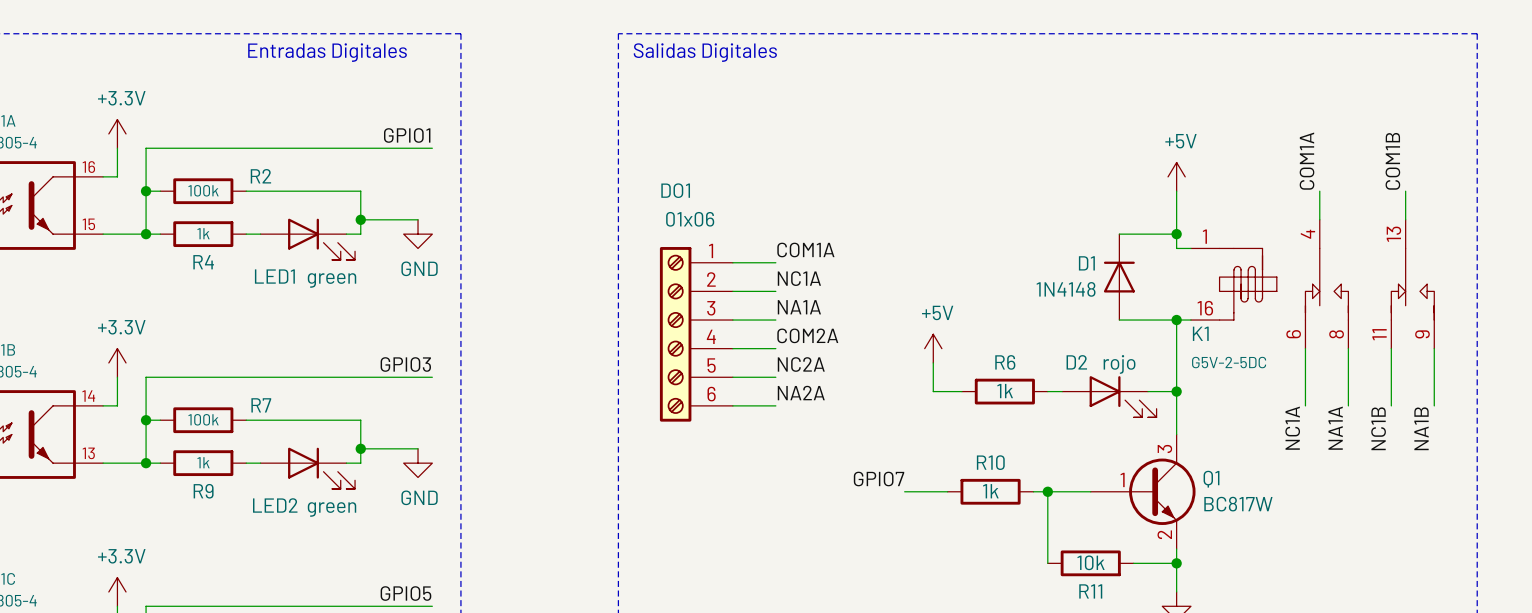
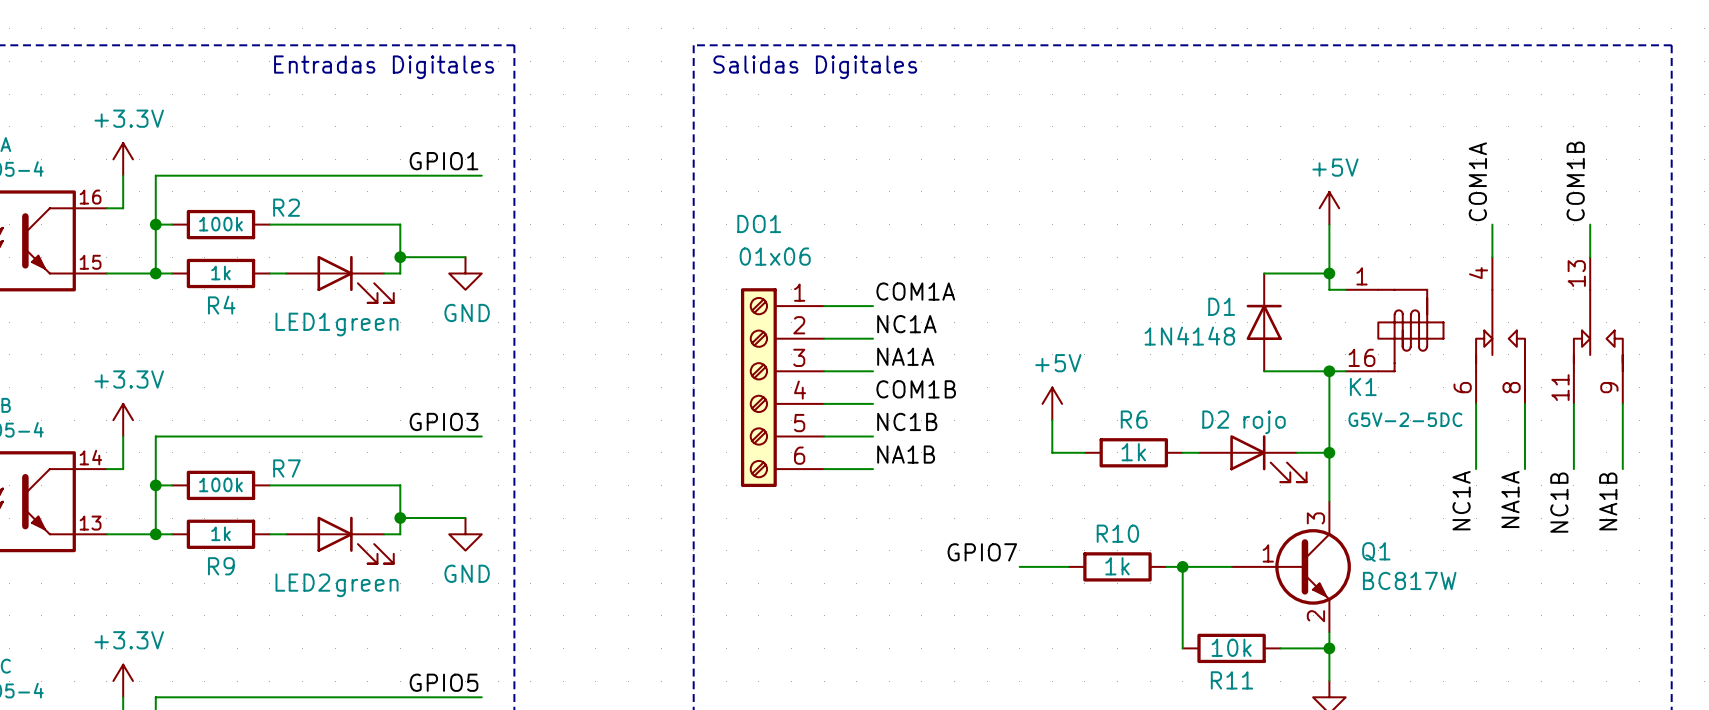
label: COM2A (807, 335) -> COM1B (916, 389)
label: NC2A (801, 364) -> NC1B (907, 421)
label: NA2A (801, 393) -> NA1B (906, 454)

